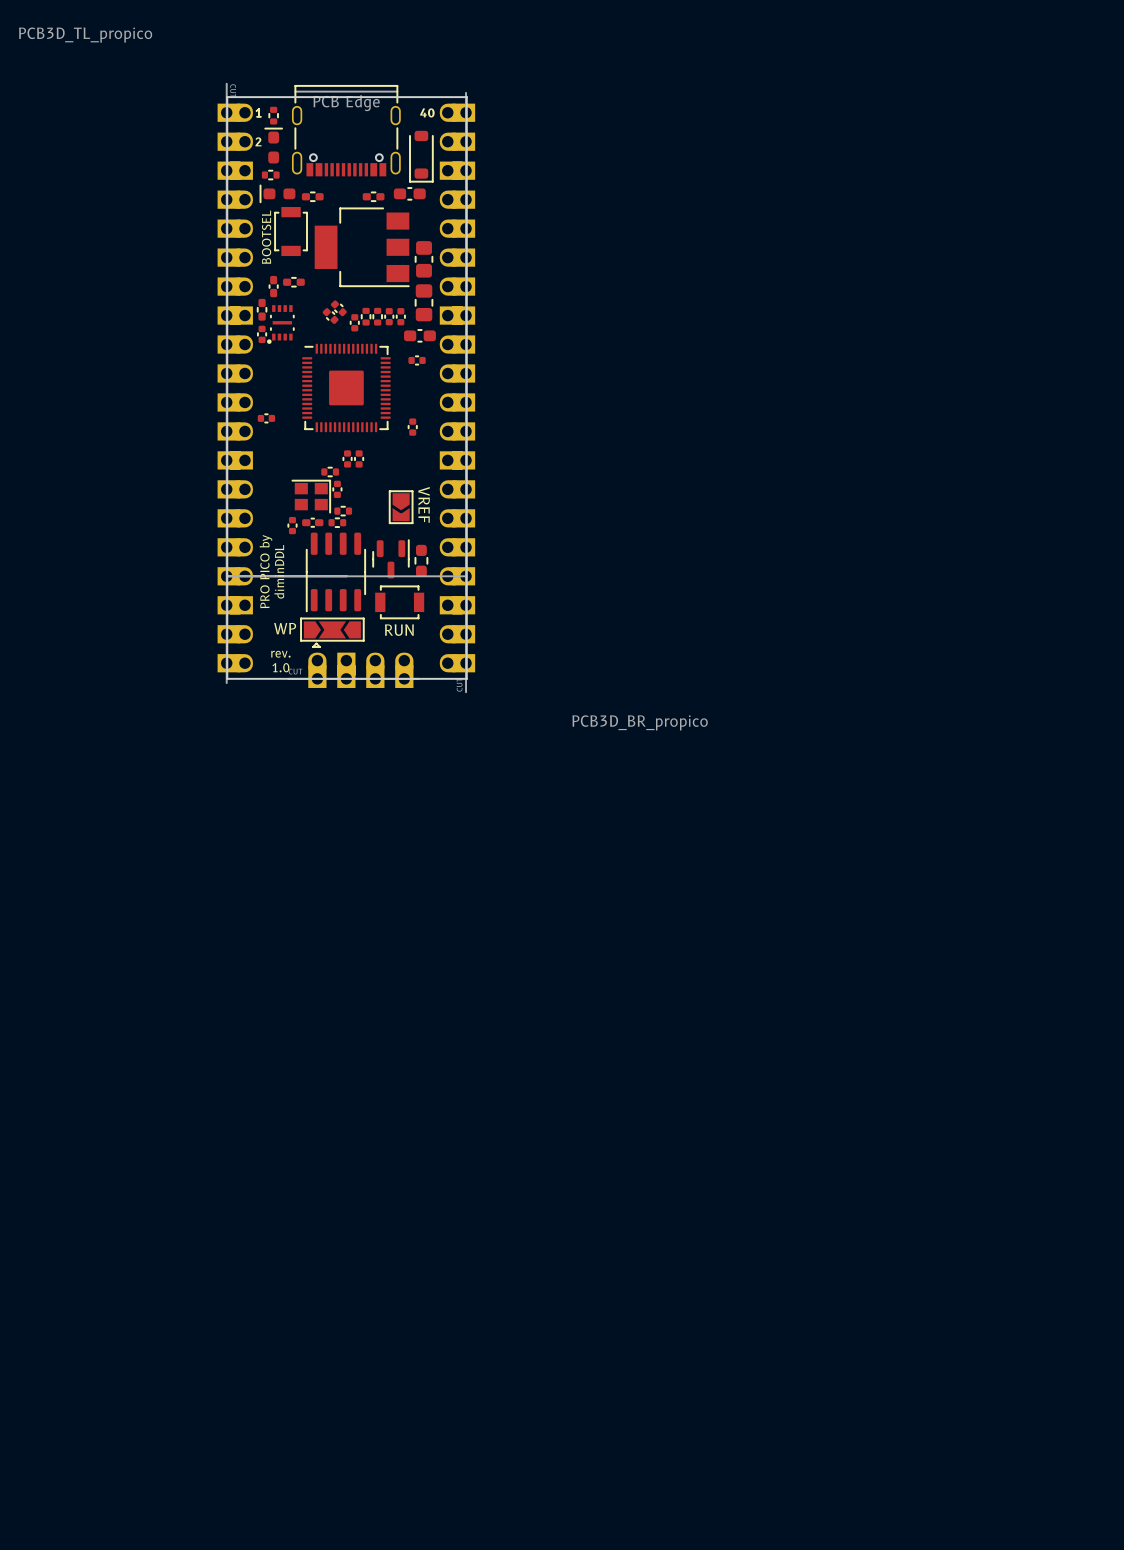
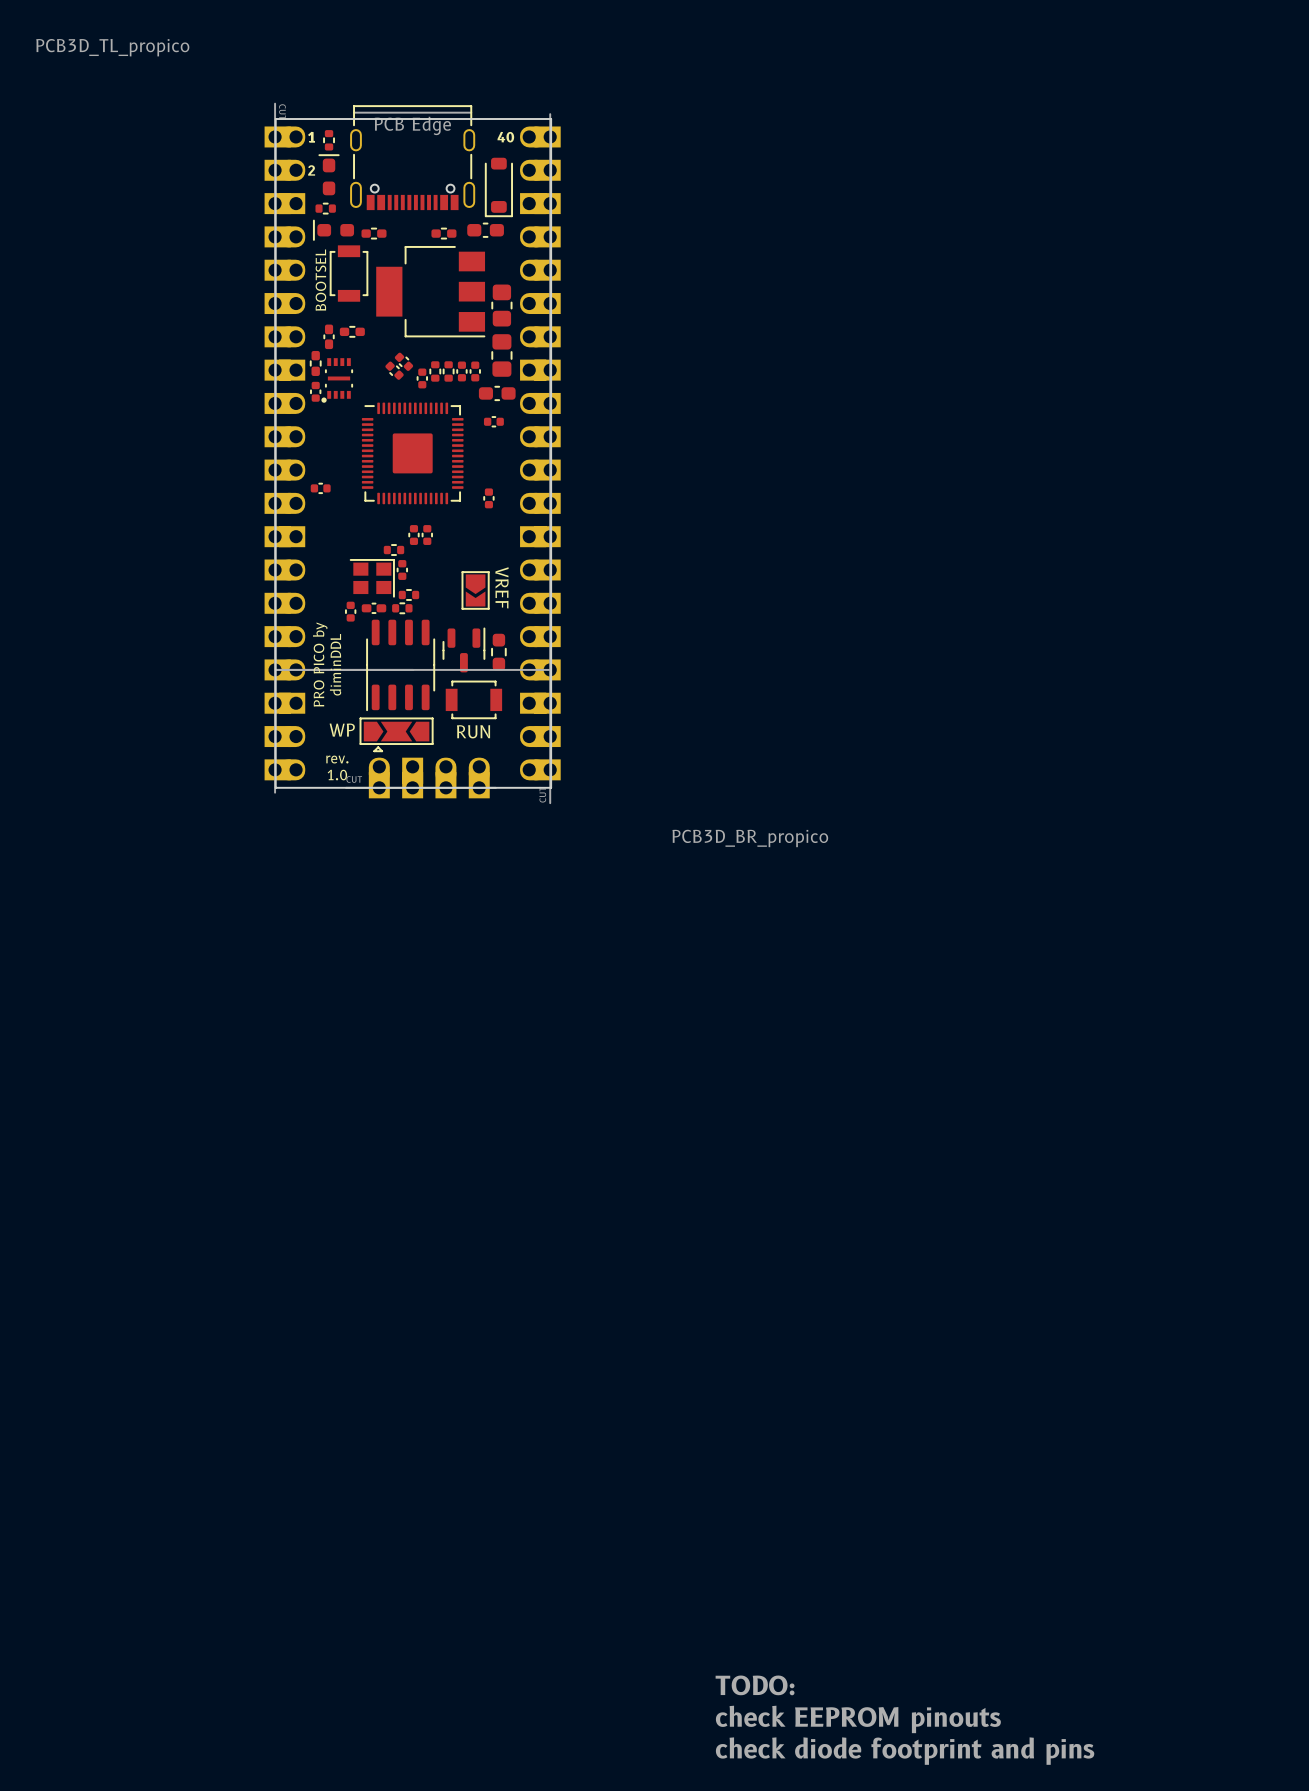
text: none -> TODO: (755, 1685)
text: none -> check EEPROM pinouts (858, 1719)
text: none -> check diode footprint and pins (905, 1751)

